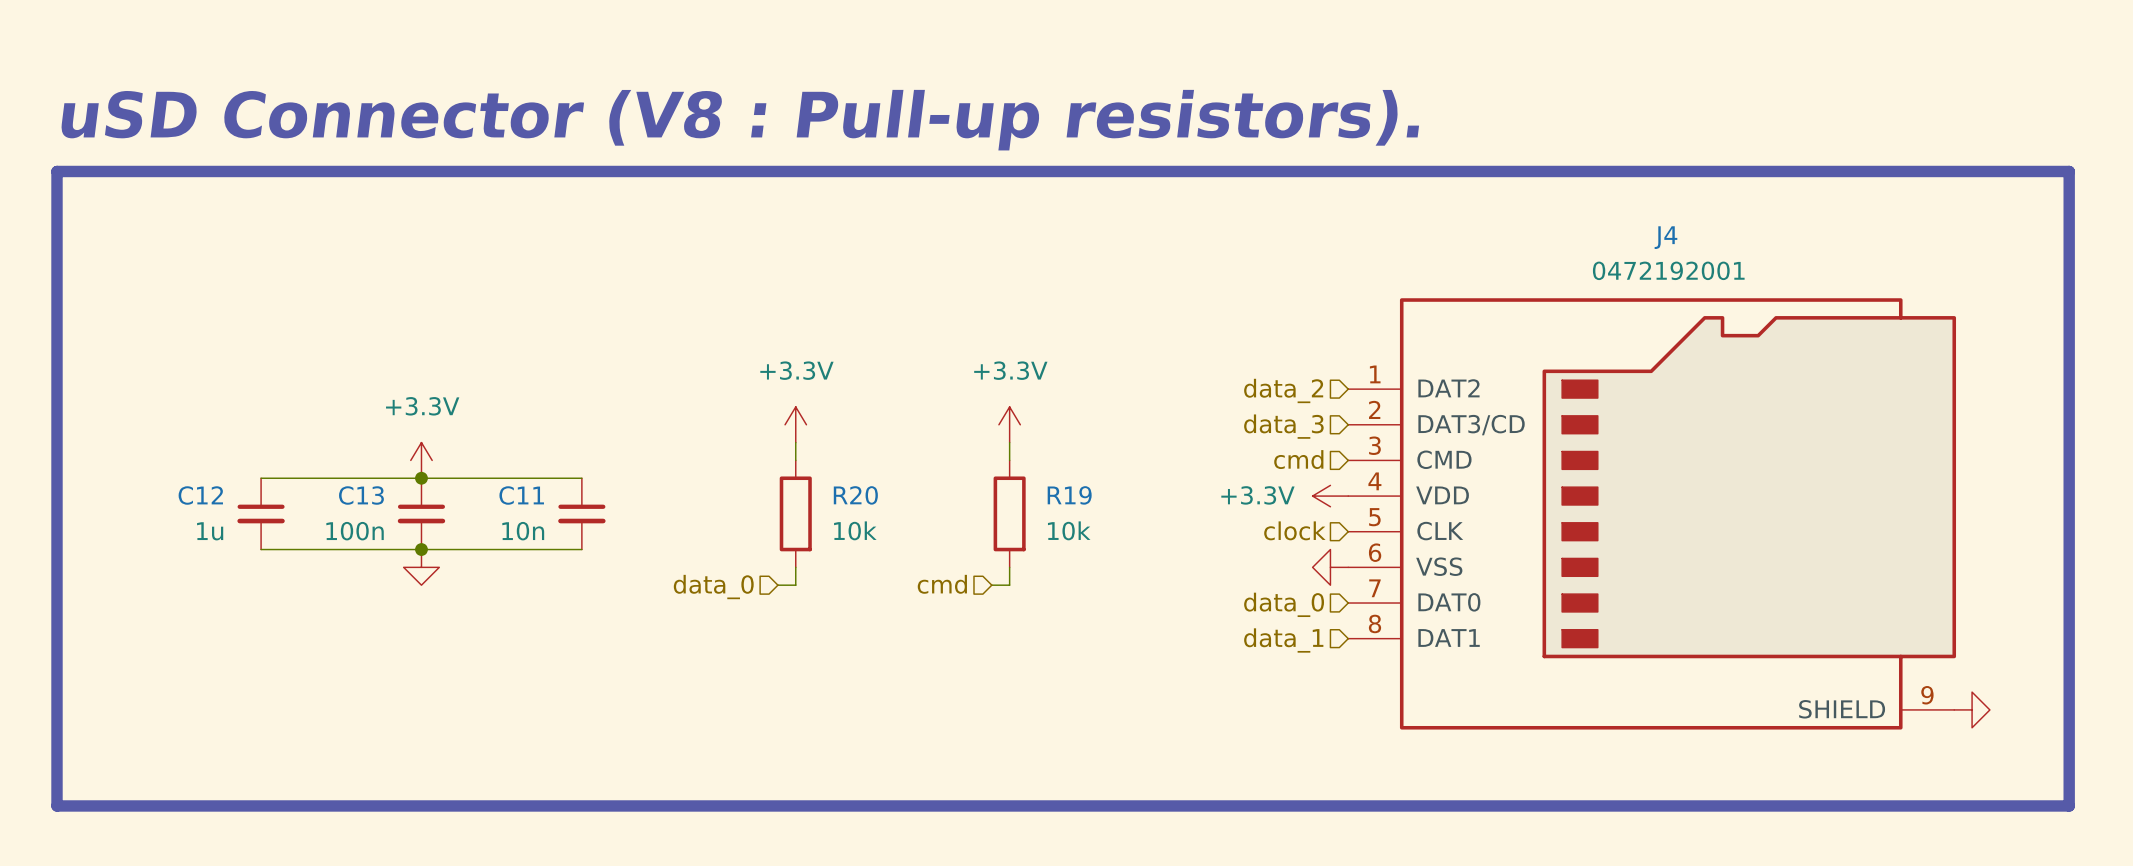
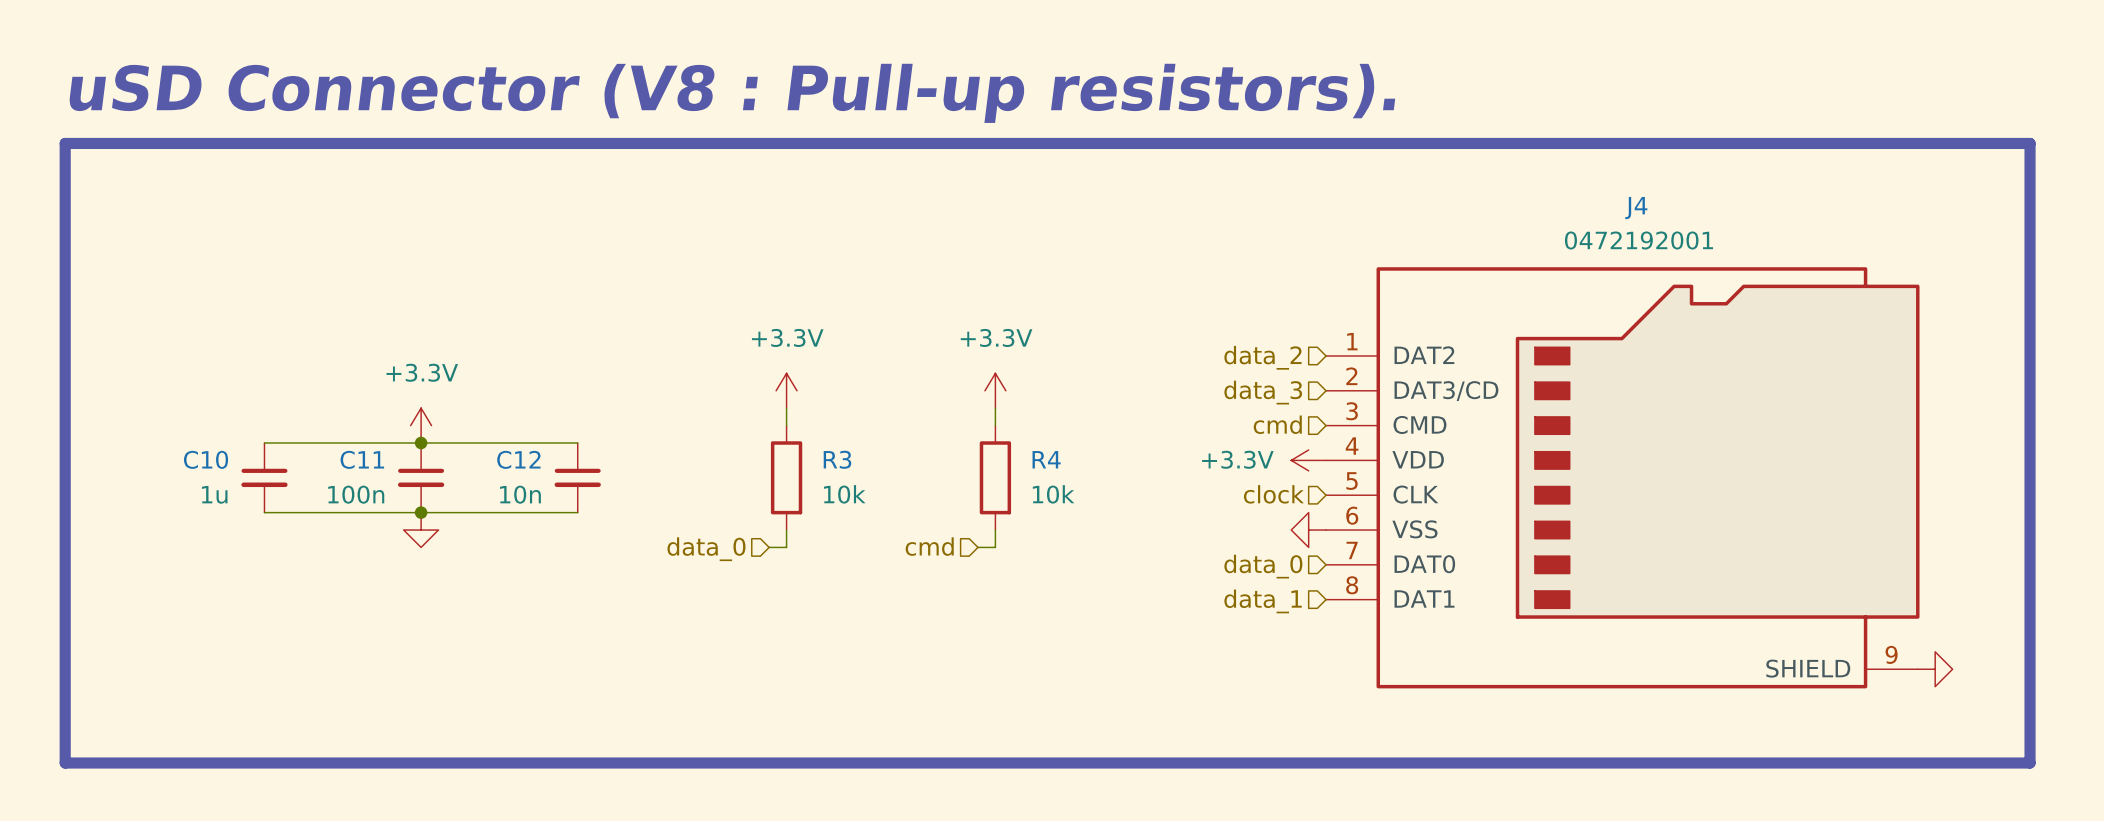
C12 name: C12 (200, 495) -> C10 (206, 459)
C13 name: C13 (361, 495) -> C11 (362, 459)
C11 name: C11 (521, 495) -> C12 (518, 459)
R20 name: R20 (855, 495) -> R3 (837, 459)
R19 name: R19 (1069, 495) -> R4 (1046, 459)

